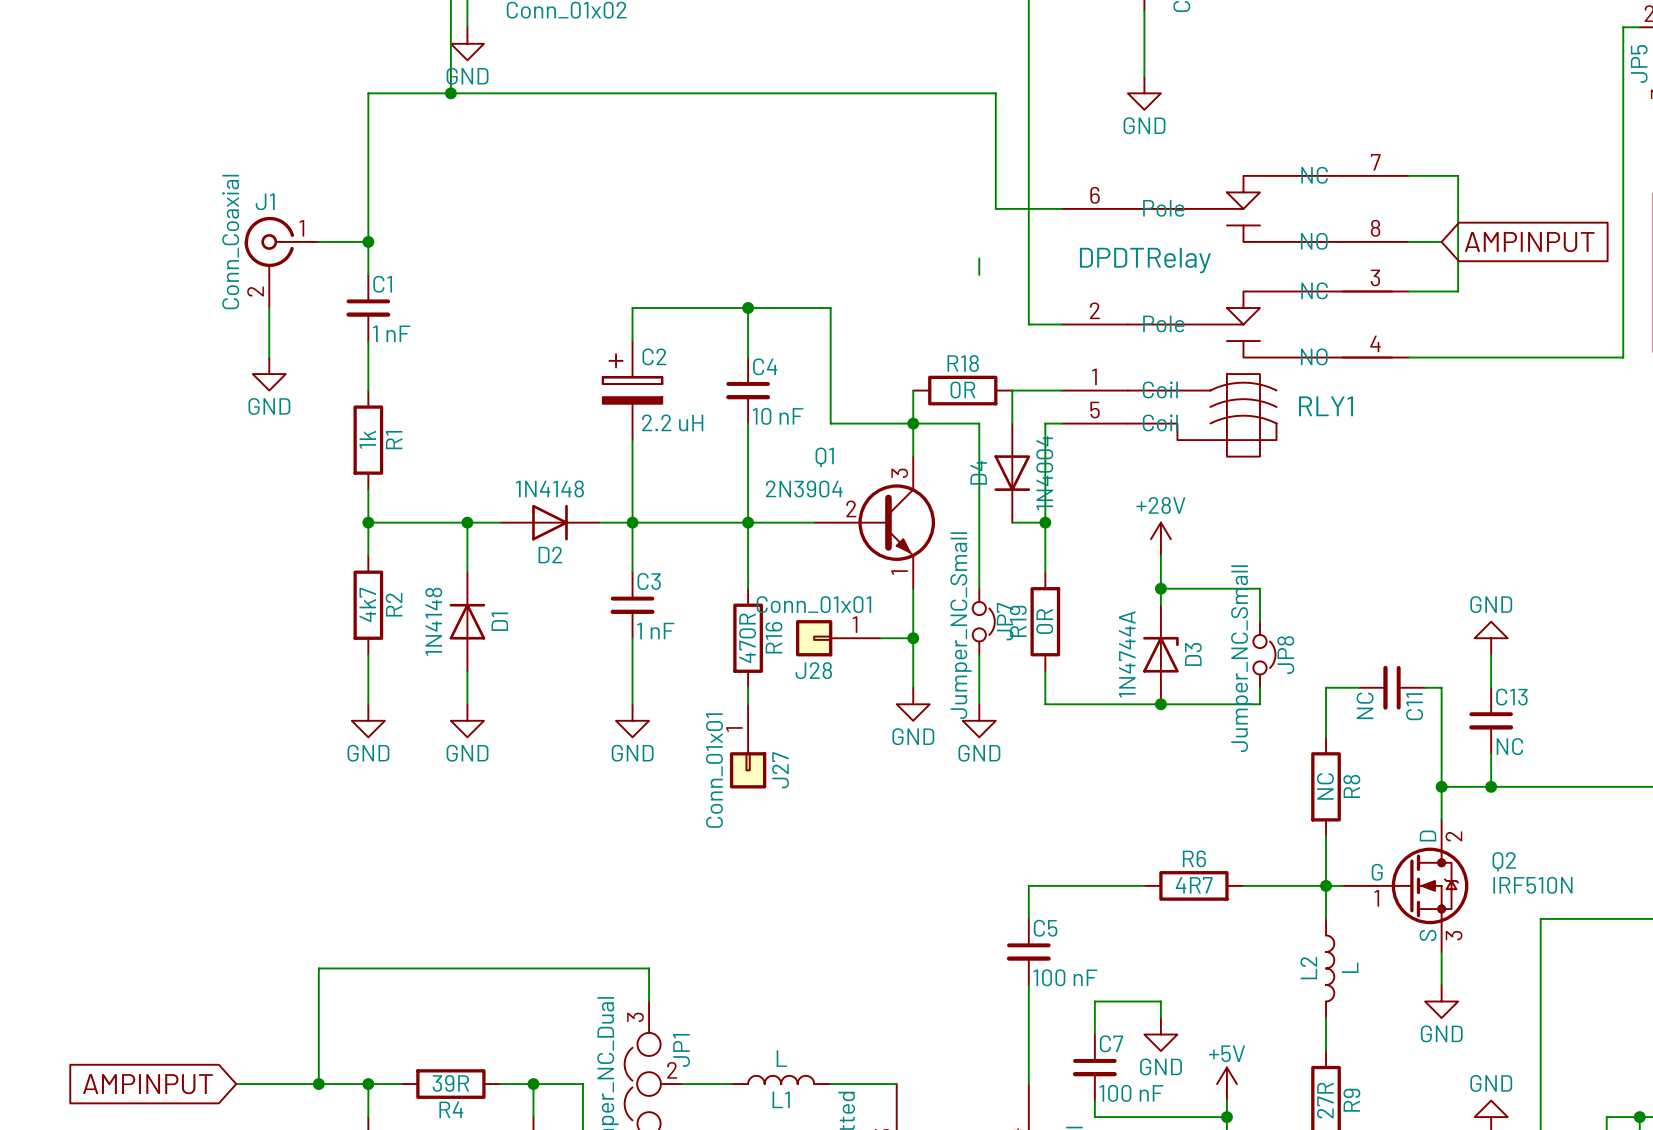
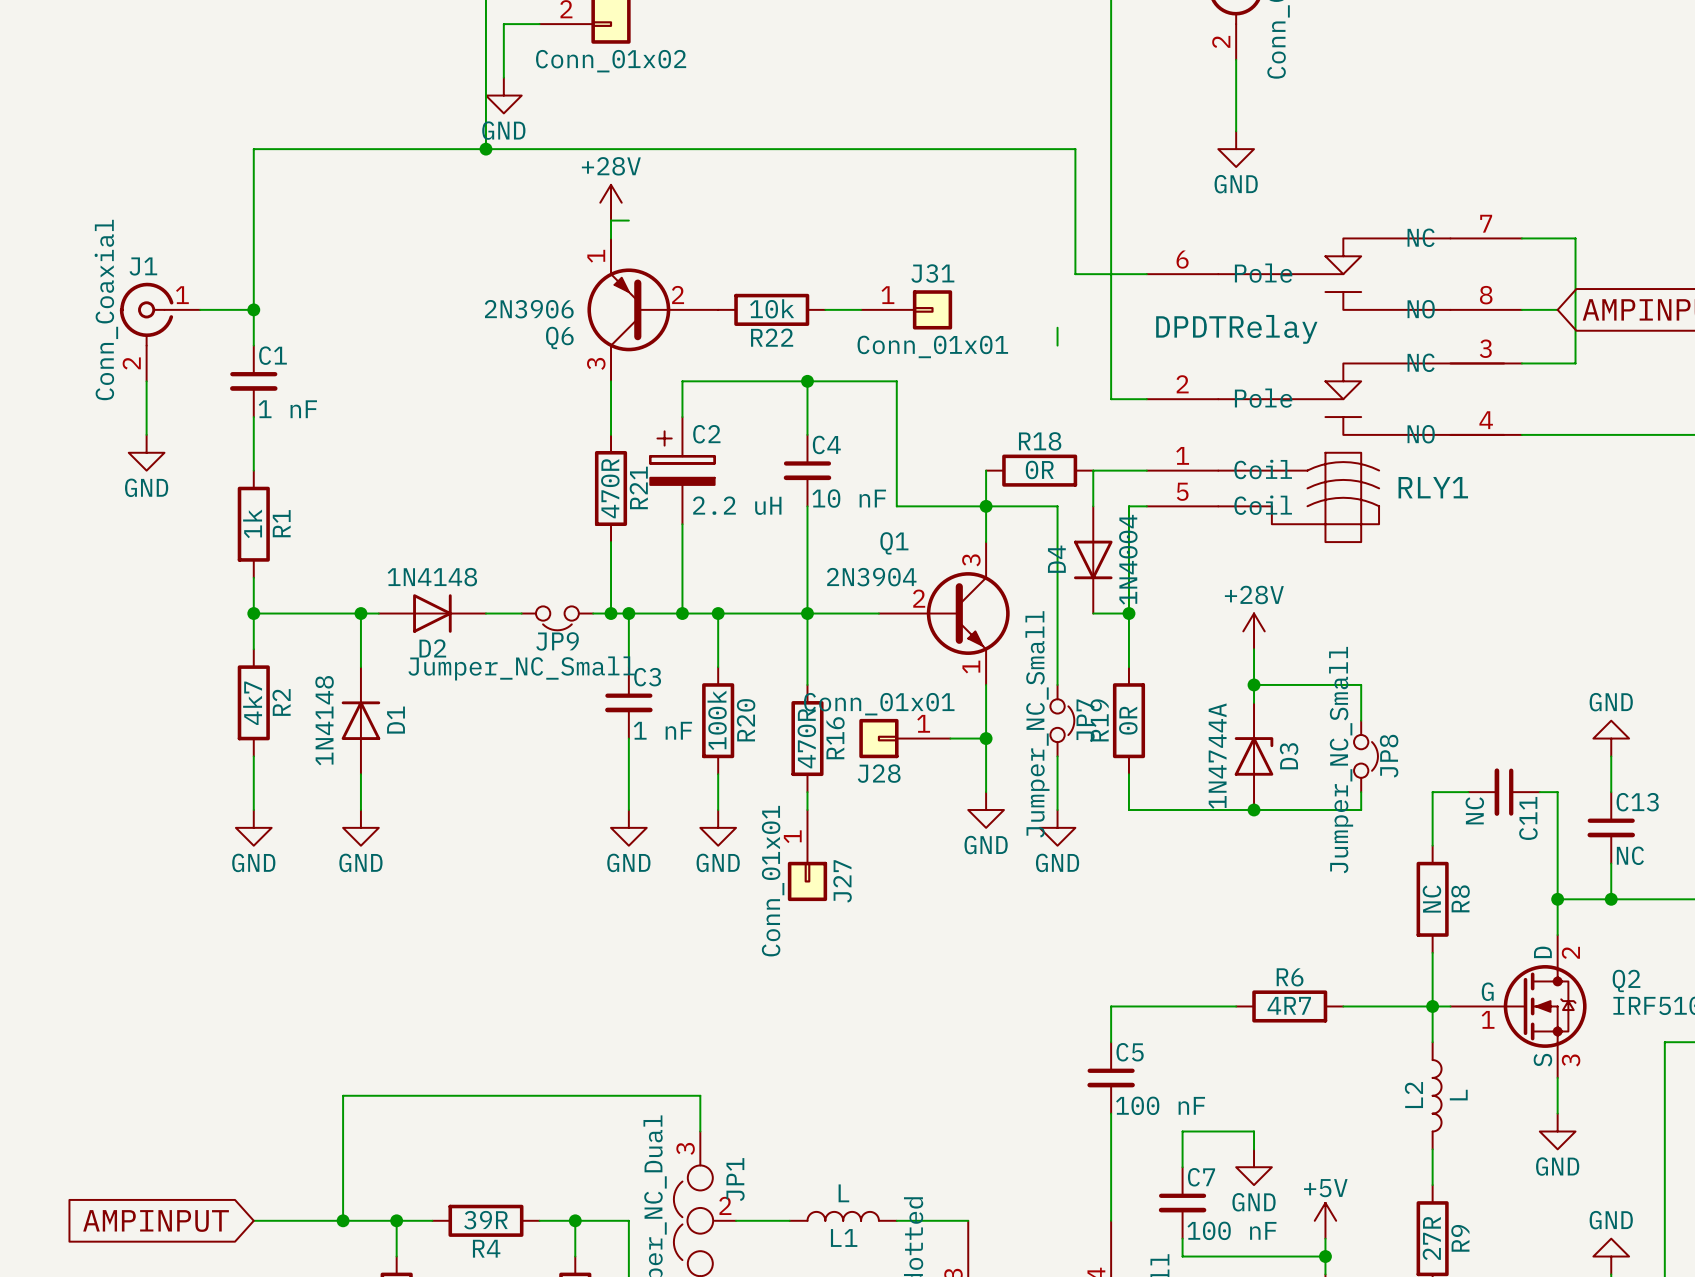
wire: (368, 93) (368, 274) -> (396, 149) (253, 149) (253, 345)
power symbol: none -> +28V (611, 202)
wire: none -> (628, 220) (611, 220) (611, 238)
junction: none -> (253, 309)
wire: (318, 241) (368, 241) -> (200, 309) (253, 309)
junction: (368, 241) -> none
Q6: none -> 2N3906 (652, 309)
R22: none -> 10k (771, 309)
wire: none -> (825, 309) (861, 309)
J31: none -> Conn_01x01 (906, 309)
J1 position: (281, 262) -> (160, 332)
wire: (269, 308) (269, 357) -> (146, 381) (146, 434)
C1 position: (368, 308) -> (253, 381)
wire: none -> (611, 381) (611, 434)
wire: (368, 341) (368, 390) -> (253, 417) (253, 470)
power symbol position: GND (269, 374) -> GND (146, 452)
R21: none -> 470R (611, 488)
R1 position: (368, 440) -> (253, 524)
wire: none -> (611, 542) (611, 613)
wire: (368, 489) (368, 555) -> (253, 577) (253, 649)
wire: none -> (253, 613) (378, 613)
junction: none -> (253, 613)
junction position: (368, 522) -> (360, 613)
wire: (467, 522) (467, 572) -> (360, 613) (360, 667)
junction: (467, 522) -> none
D2 position: (549, 522) -> (432, 613)
junction: none -> (611, 613)
junction: none -> (628, 613)
wire: (632, 522) (632, 572) -> (628, 613) (628, 667)
wire: none -> (718, 613) (718, 667)
junction: none -> (718, 613)
JP9: none -> Jumper_NC_Small (557, 618)
R2 position: (368, 605) -> (253, 702)
C3 position: (632, 605) -> (628, 702)
D1 position: (467, 621) -> (360, 720)
R20: none -> 100k (718, 720)
wire: (632, 638) (632, 704) -> (628, 738) (628, 810)
wire: (368, 654) (368, 704) -> (253, 756) (253, 810)
wire: (467, 671) (467, 704) -> (360, 774) (360, 810)
wire: none -> (718, 774) (718, 810)
power symbol: none -> GND (253, 827)
power symbol position: GND (368, 720) -> GND (360, 827)
power symbol: GND (467, 720) -> none
power symbol: none -> GND (628, 827)
power symbol: GND (632, 720) -> none
power symbol: none -> GND (718, 827)

